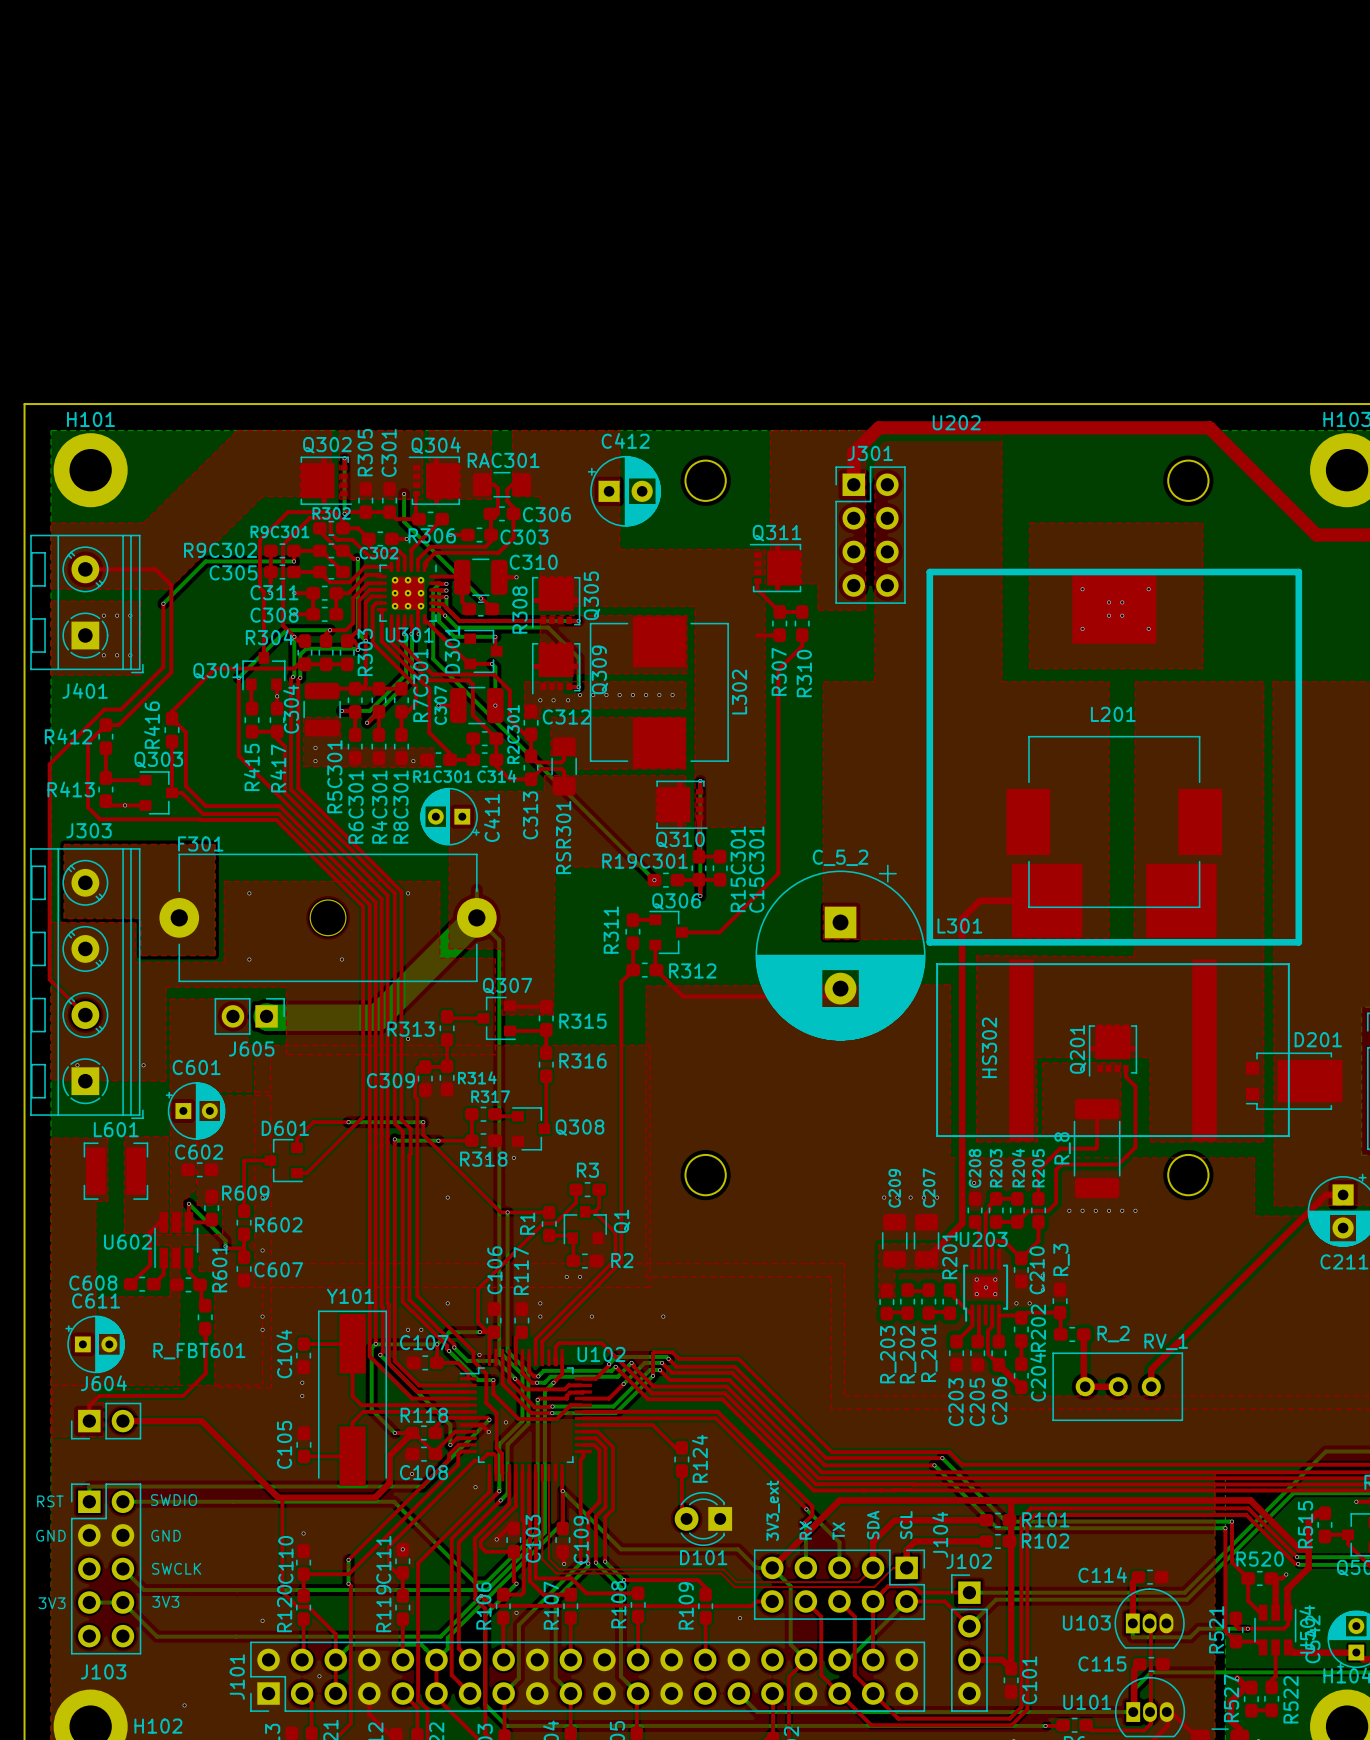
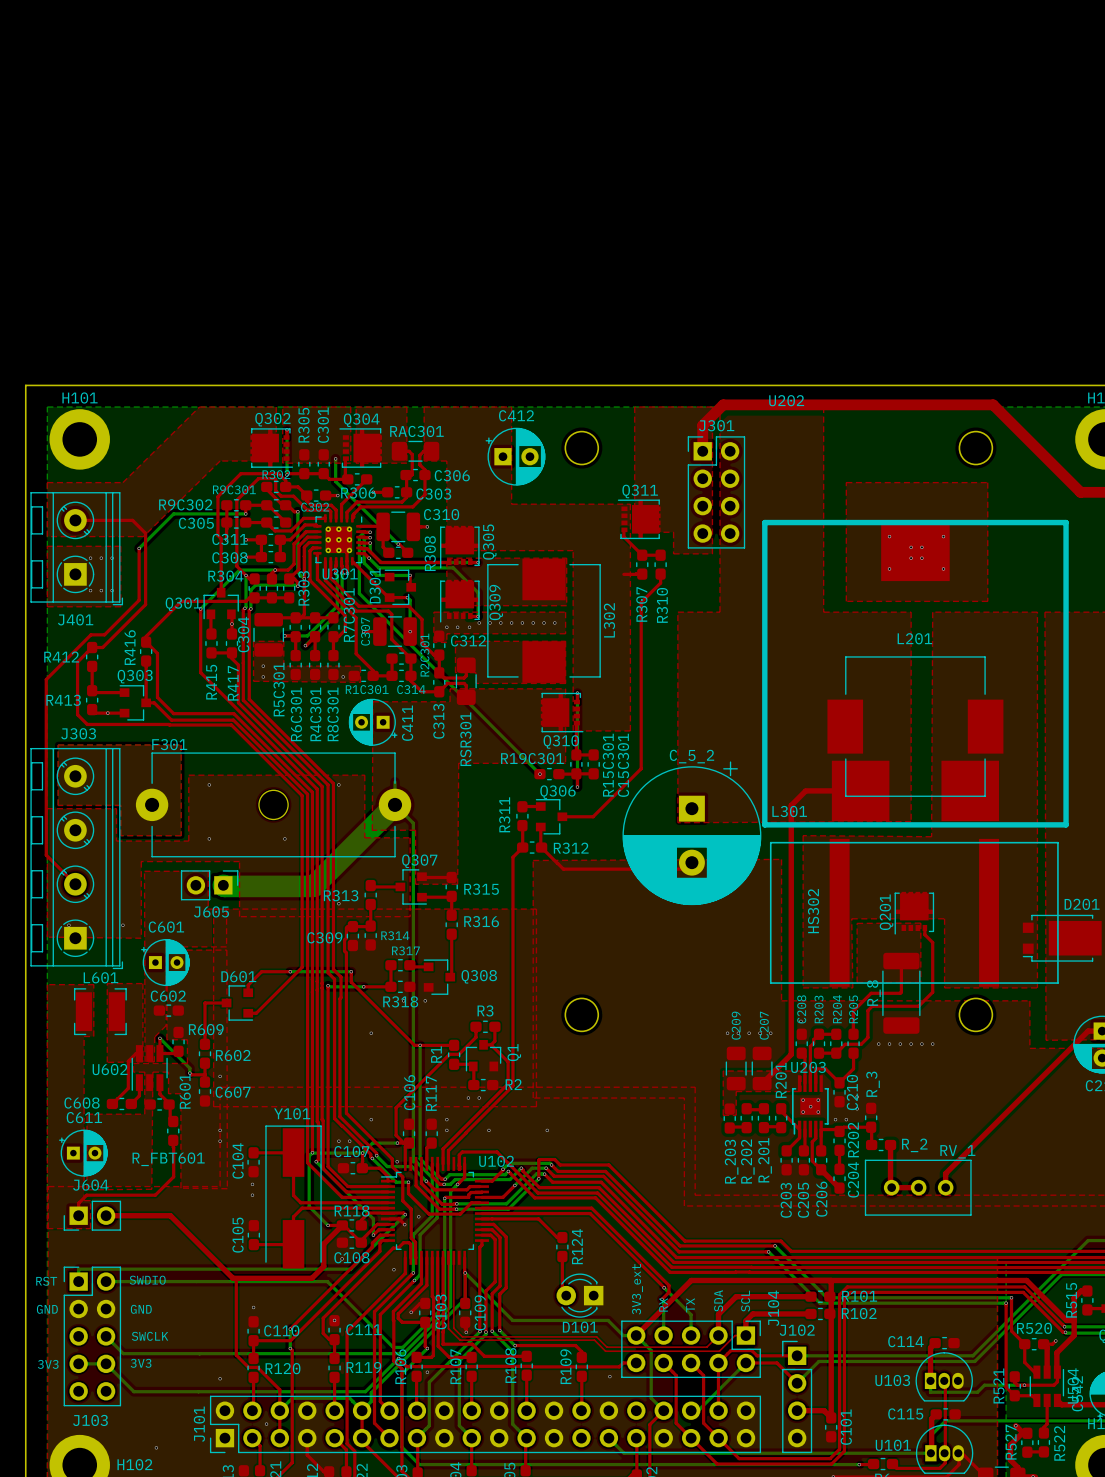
C110 name rotation: 0° (285, 1559) -> 90° clockwise (281, 1330)
C111 name rotation: 0° (383, 1559) -> 90° clockwise (363, 1329)
R120 name rotation: 0° (284, 1608) -> 90° clockwise (282, 1368)
R119 name rotation: 0° (383, 1608) -> 90° clockwise (363, 1367)

